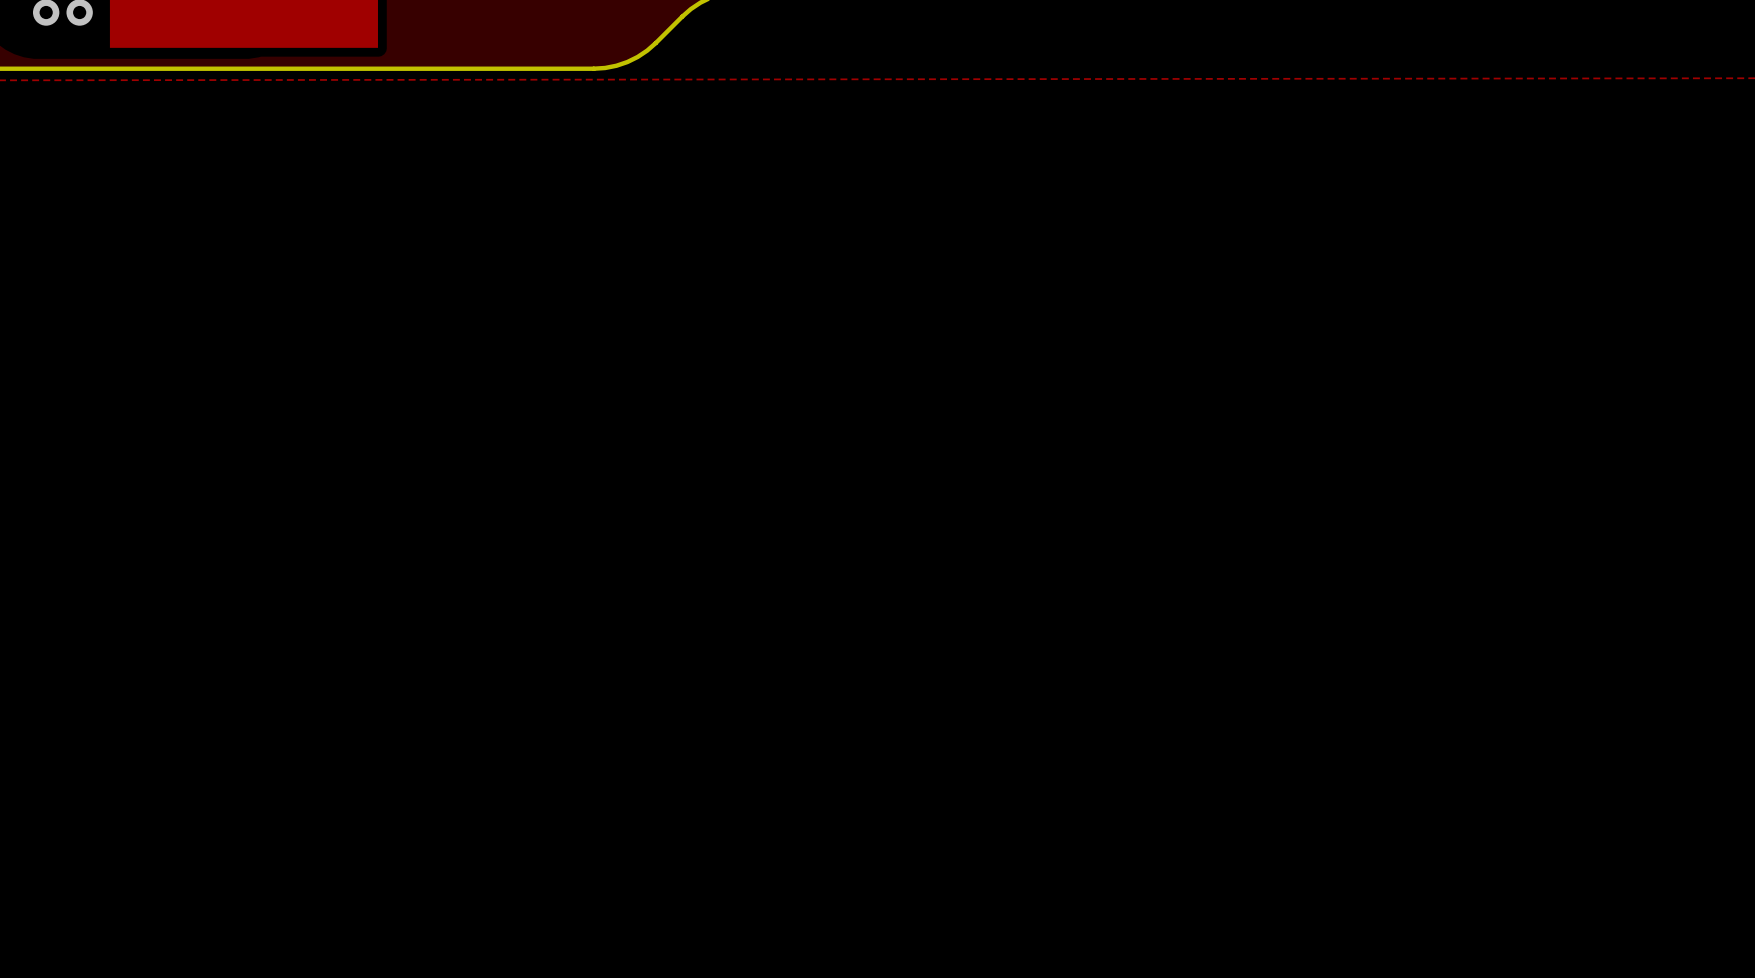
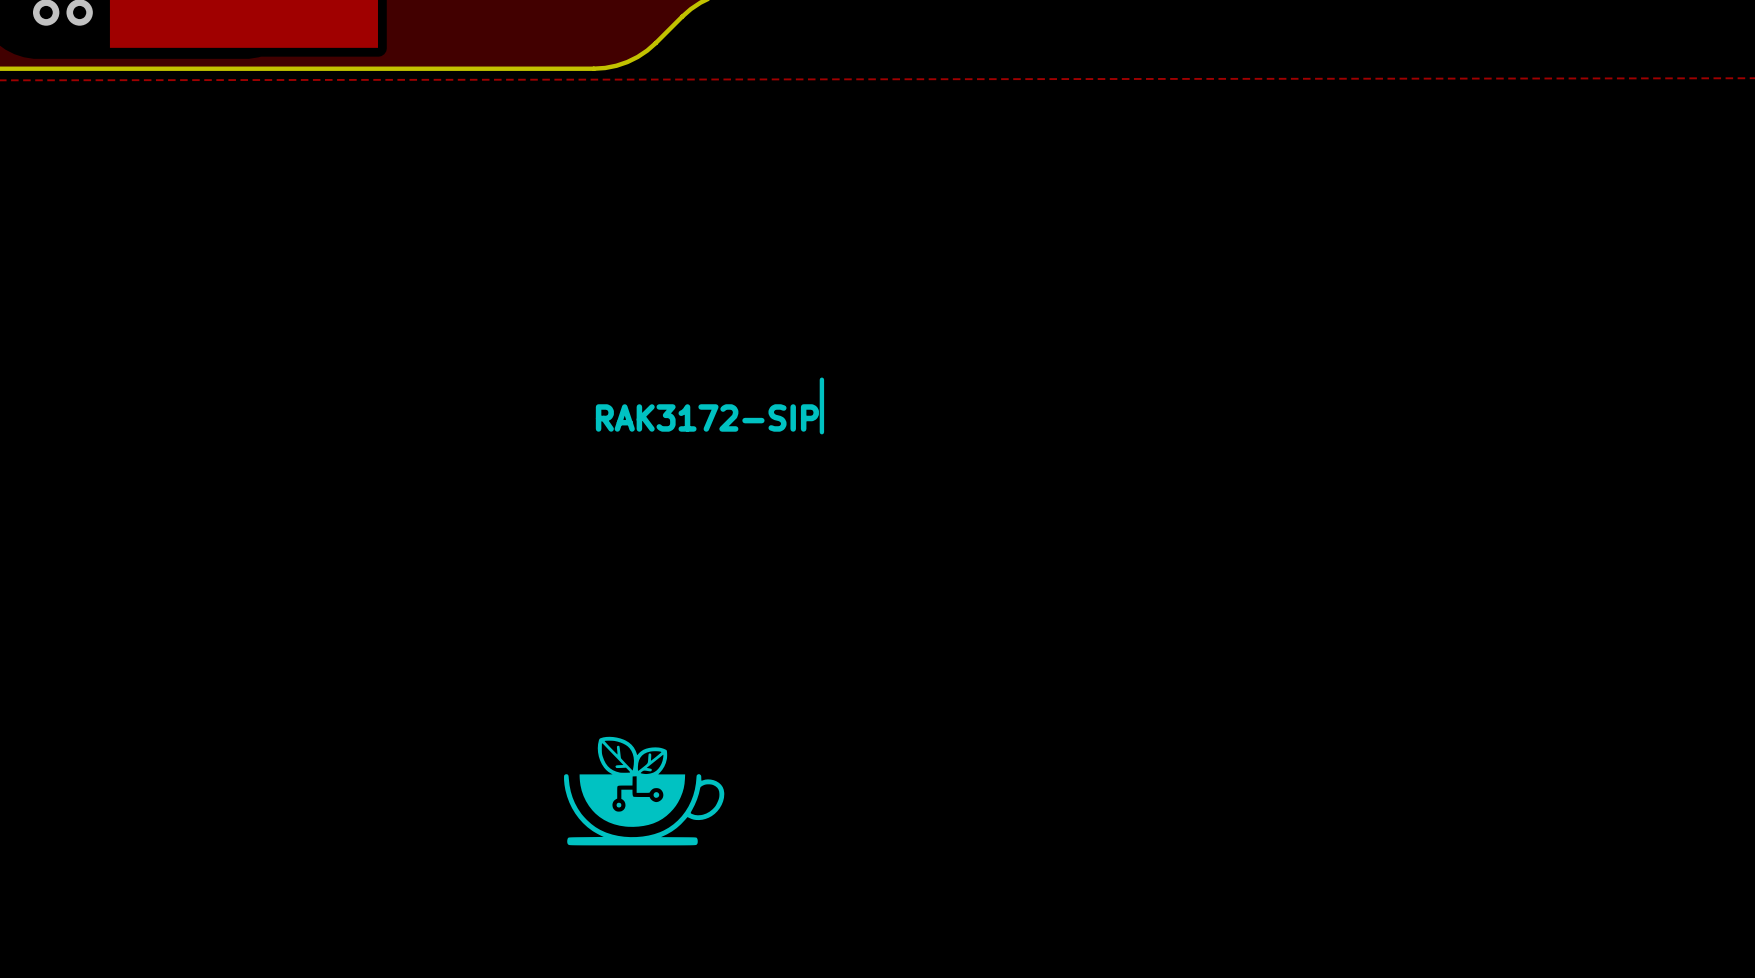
line: none -> (821, 379) (821, 432)
text: none -> RAK3172-SIP (707, 417)
drawing: none -> [564, 736, 725, 846]

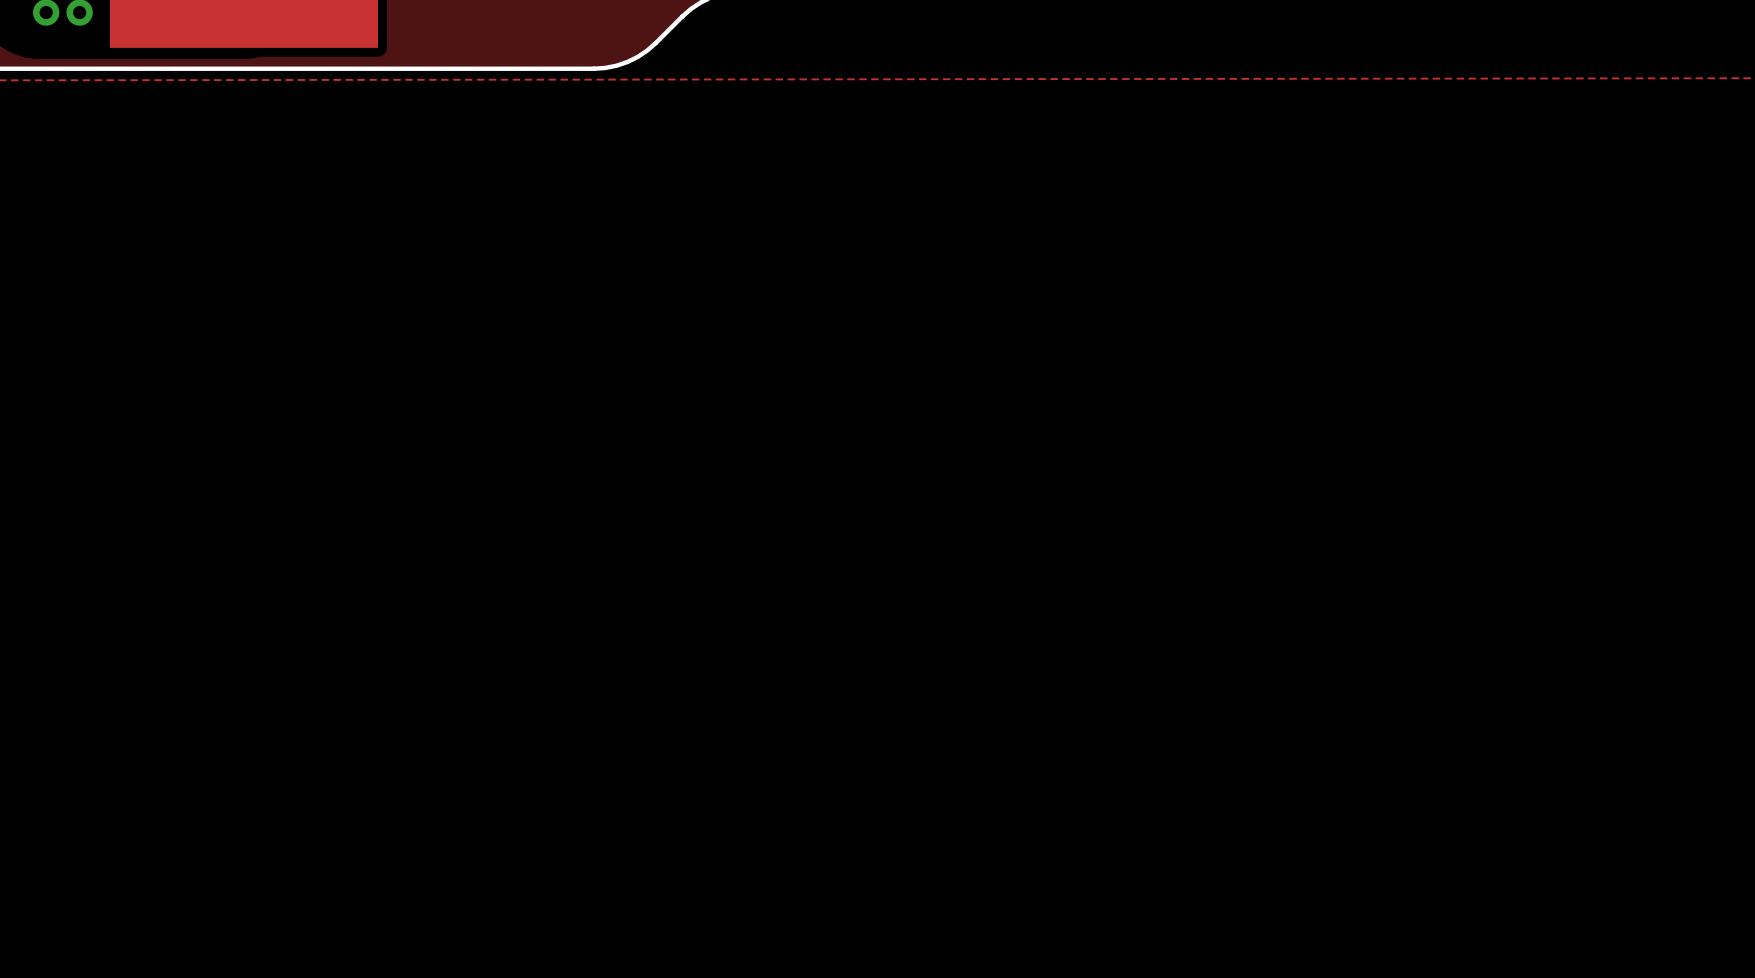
line: (821, 379) (821, 432) -> none
text: RAK3172-SIP (707, 417) -> none
drawing: [564, 736, 725, 846] -> none

